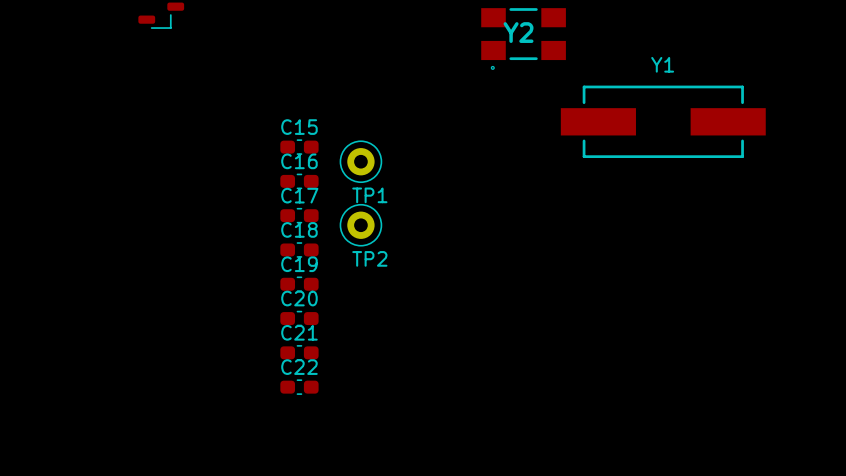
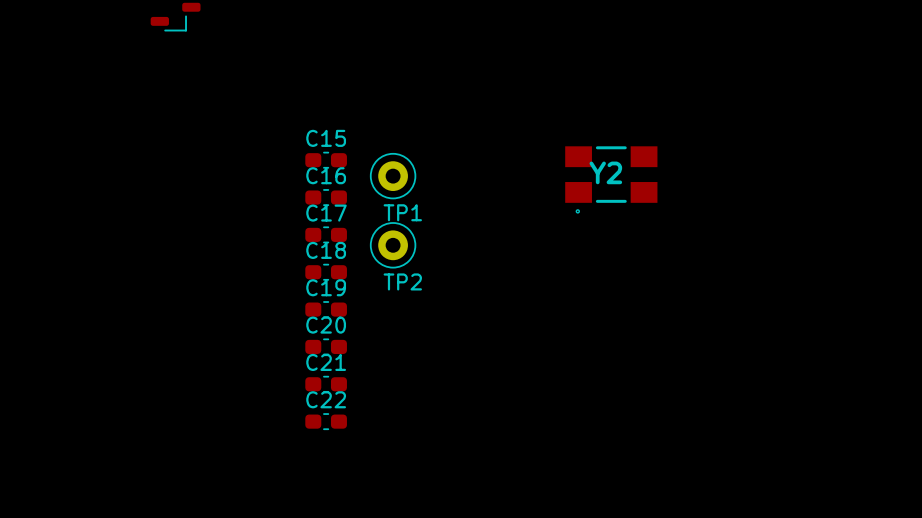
Y2 position: (523, 39) -> (611, 179)
Y1: (663, 121) -> none

